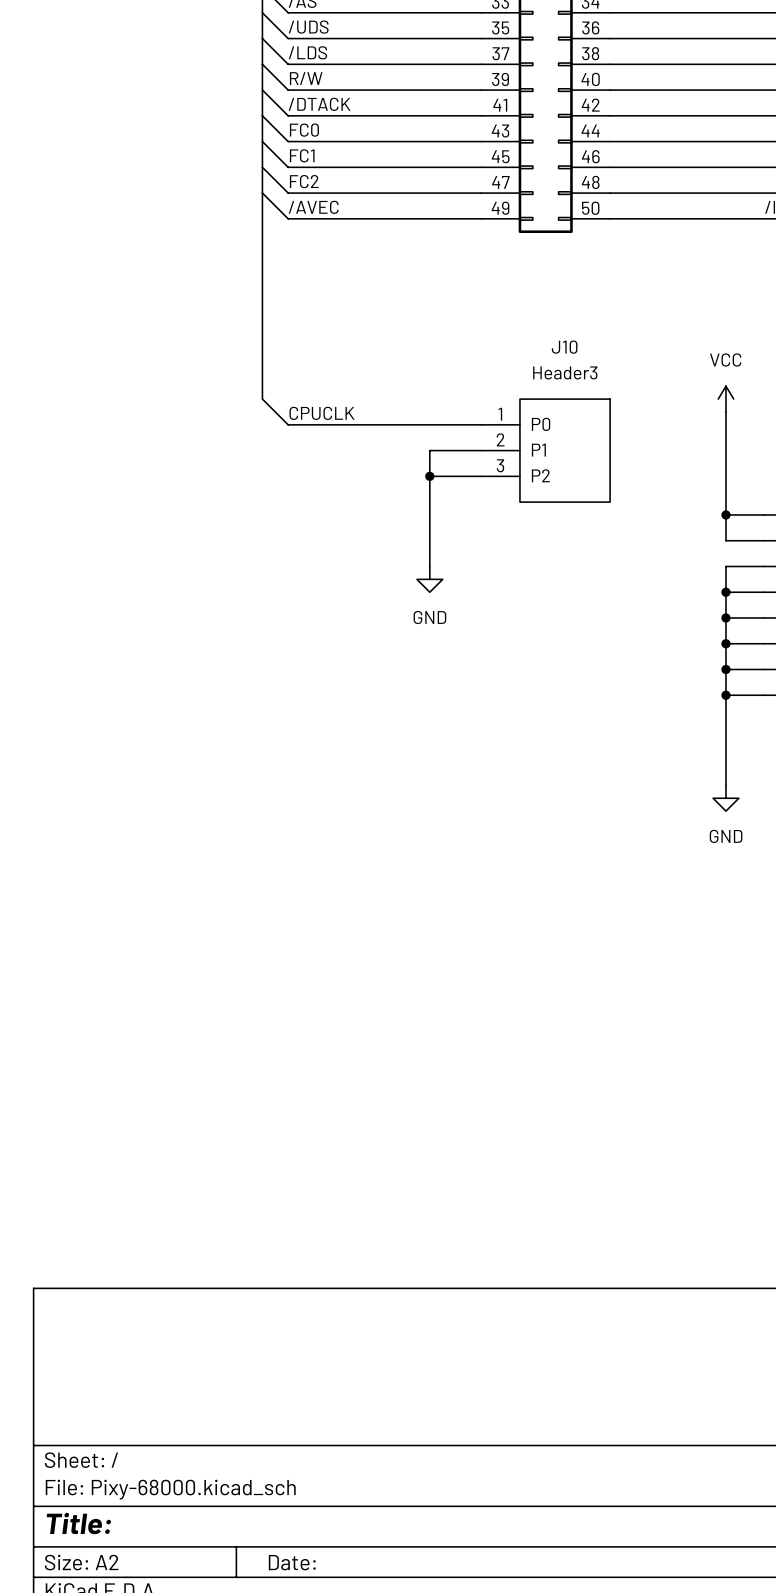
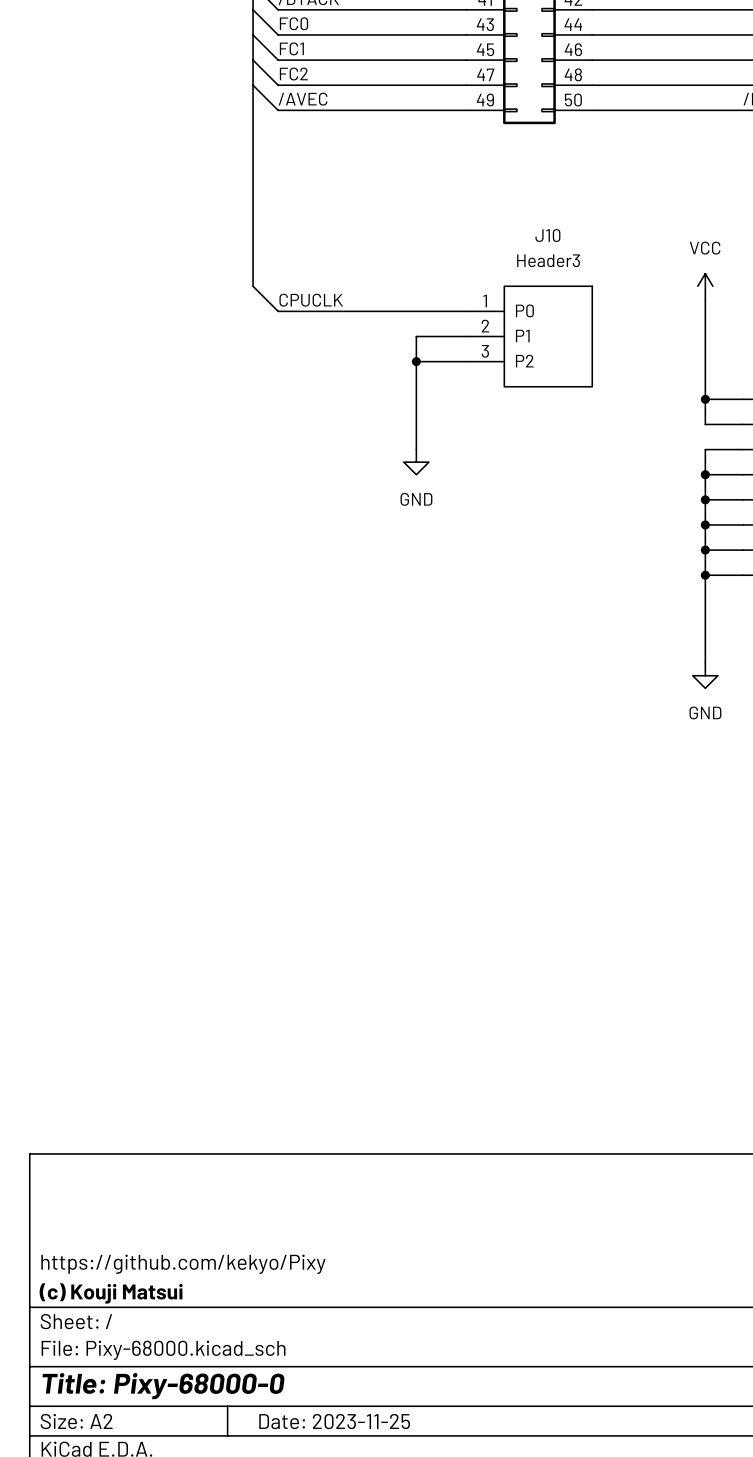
title block: none -> https://github.com/kekyo/Pixy (183, 1264)
title block: none -> (c) Kouji Matsui (111, 1293)
title block: Title: (78, 1523) -> Title: Pixy-68000-0 (163, 1386)
title block: Date: (292, 1562) -> Date: 2023-11-25 (334, 1421)

